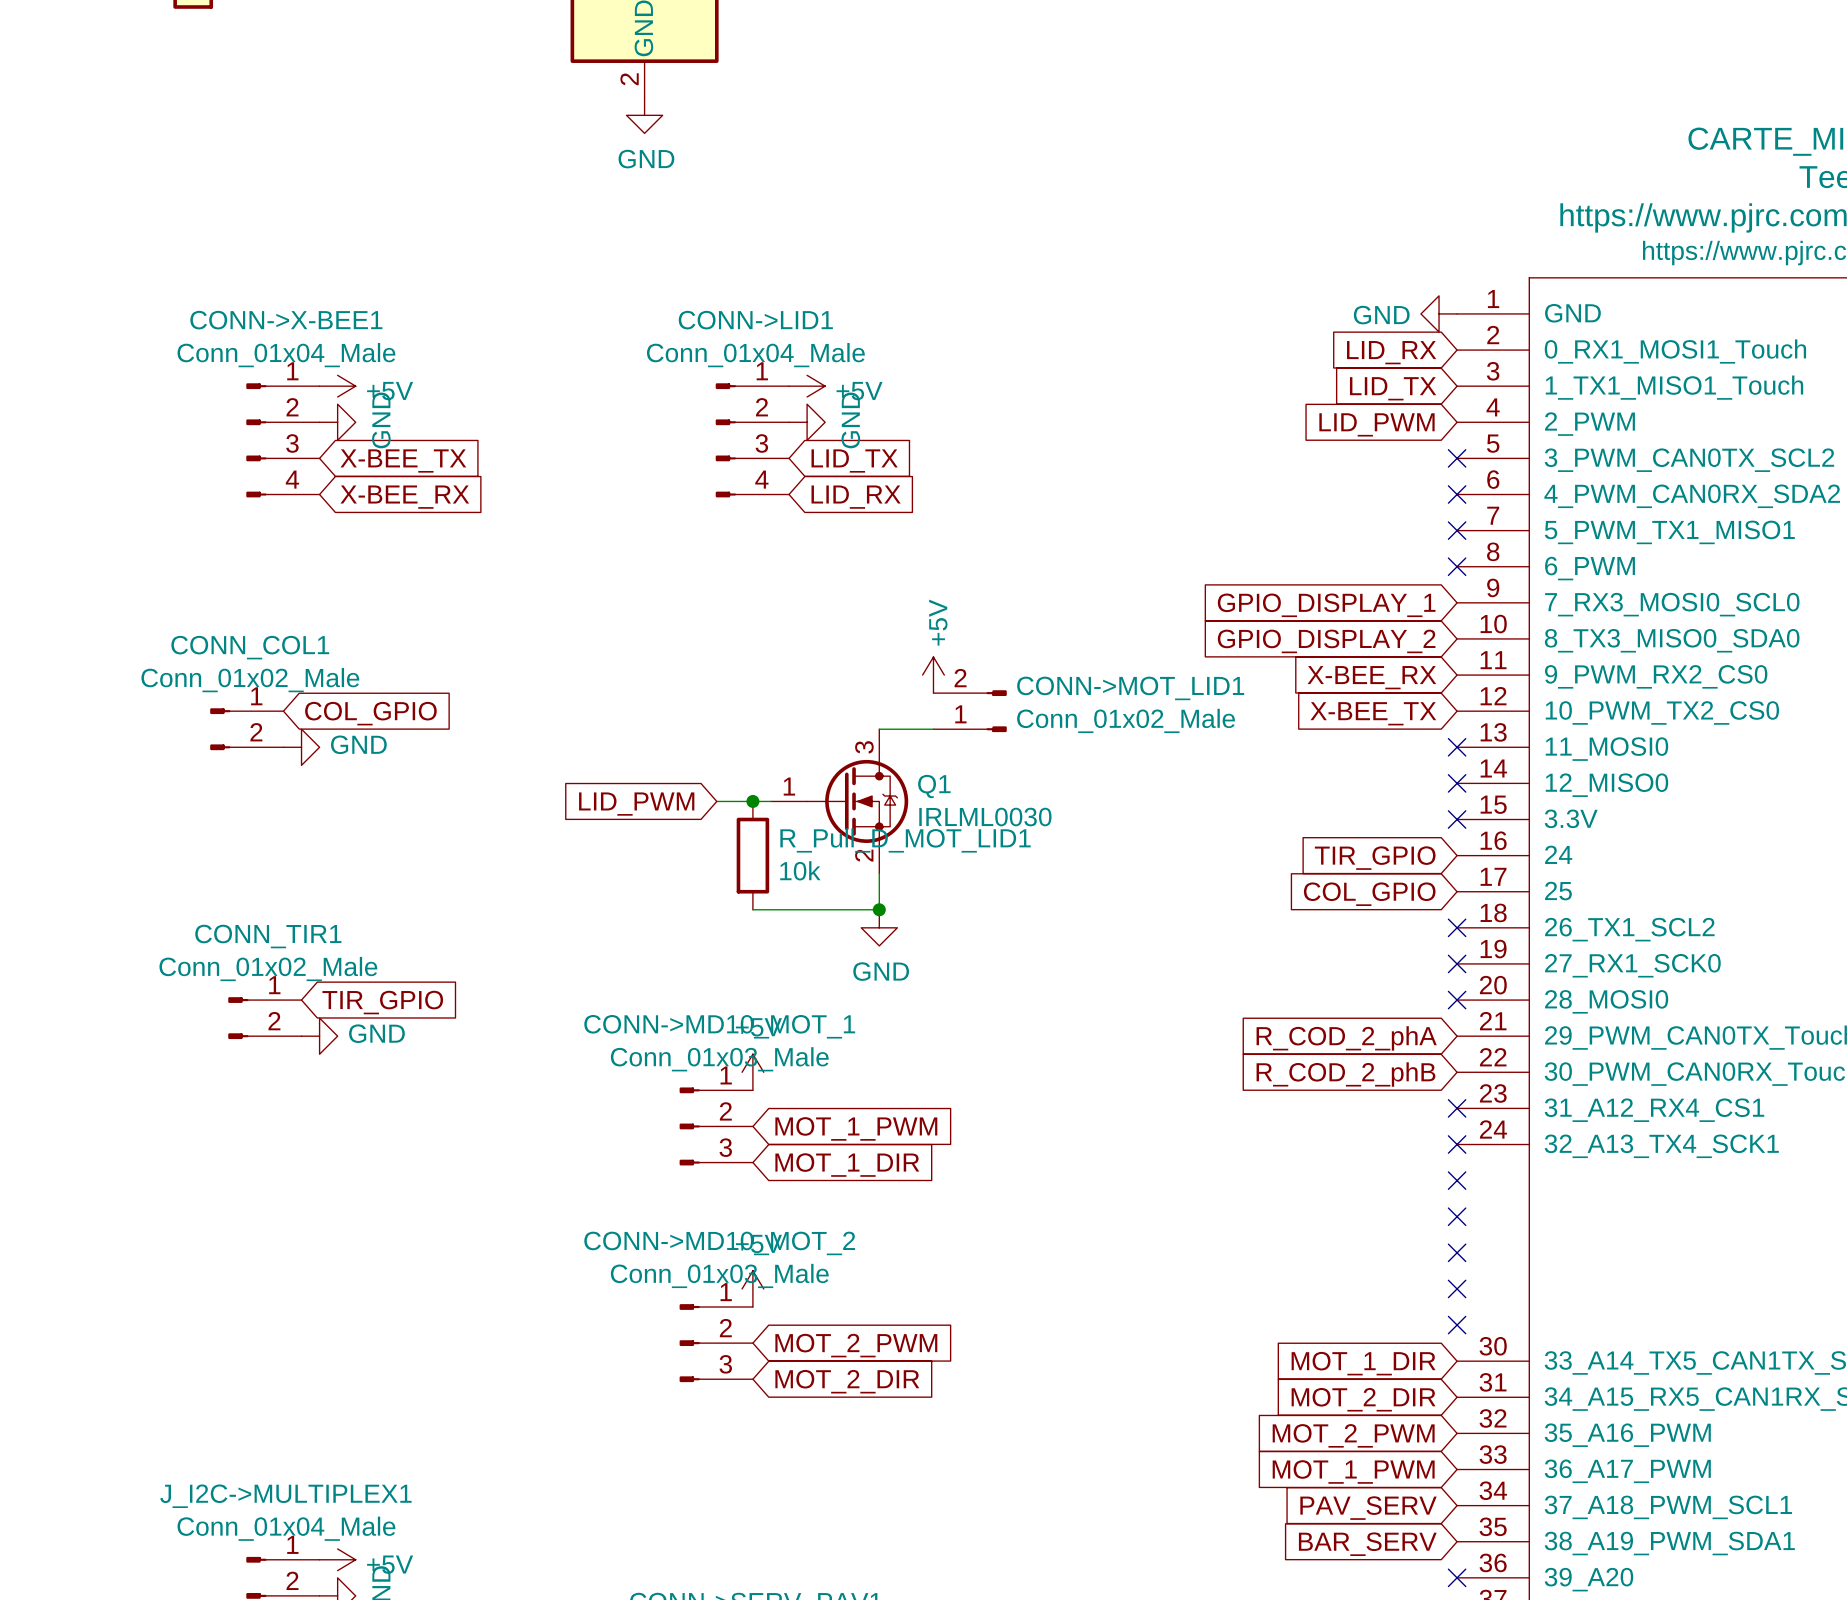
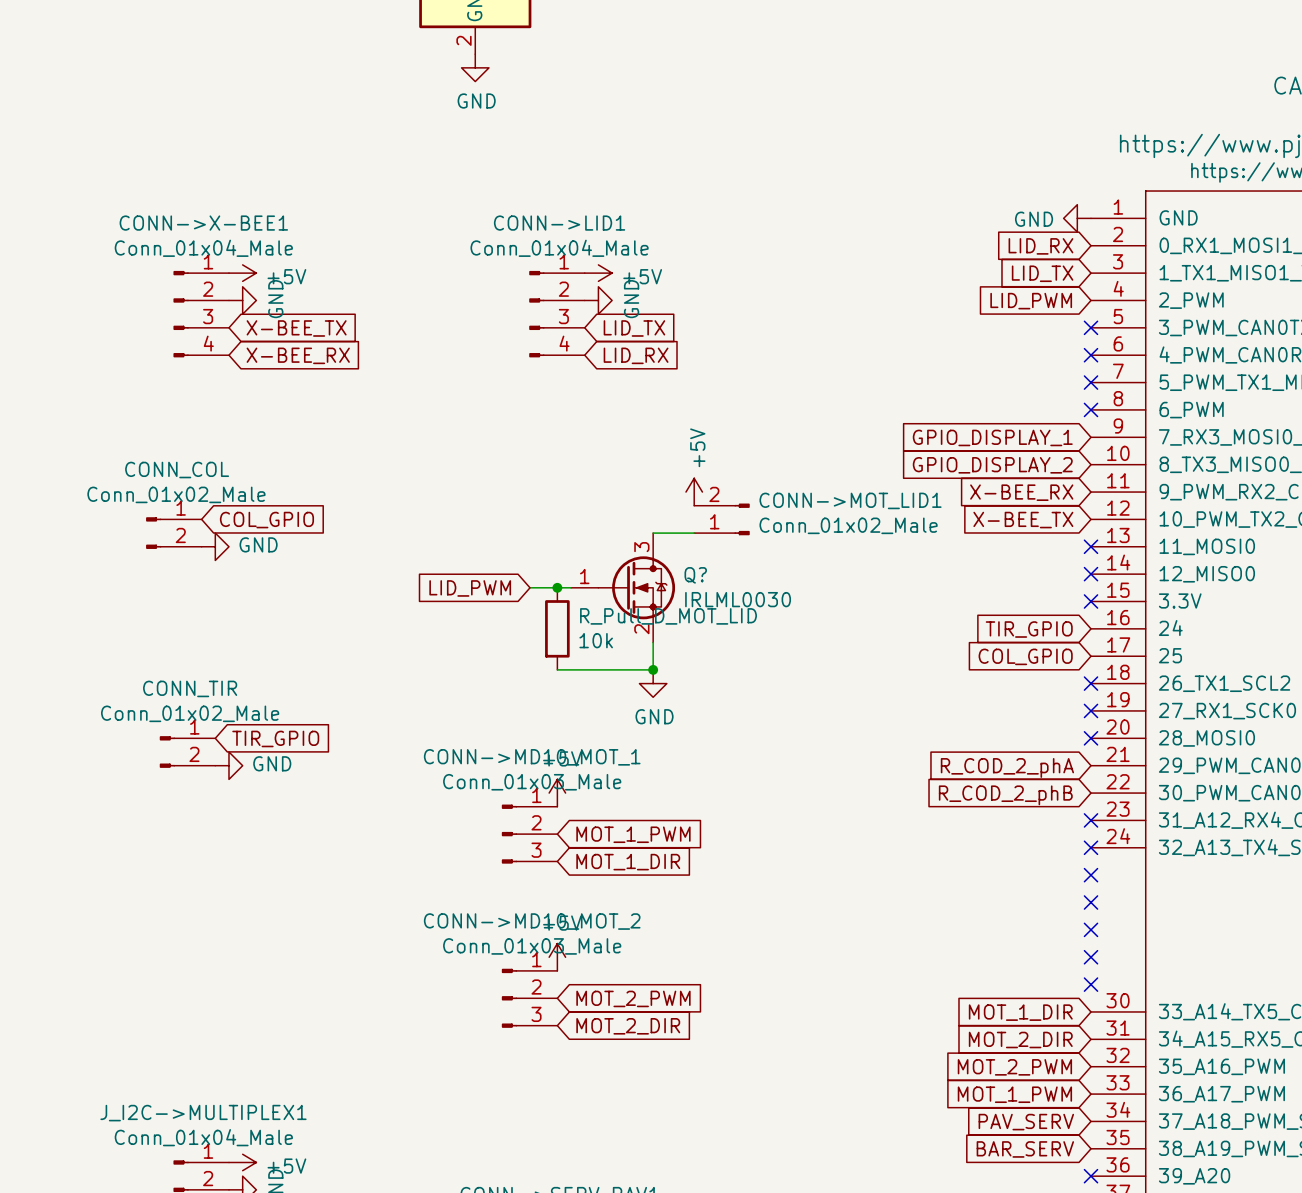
CONN_COL1 name: CONN_COL1 (250, 647) -> CONN_COL (177, 470)
Q1 name: Q1 (934, 786) -> Q? (695, 575)
R_Pull_D_MOT_LID1 name: R_Pull_D_MOT_LID1 (905, 840) -> R_Pull_D_MOT_LID (668, 616)
CONN_TIR1 name: CONN_TIR1 (268, 936) -> CONN_TIR (190, 688)

